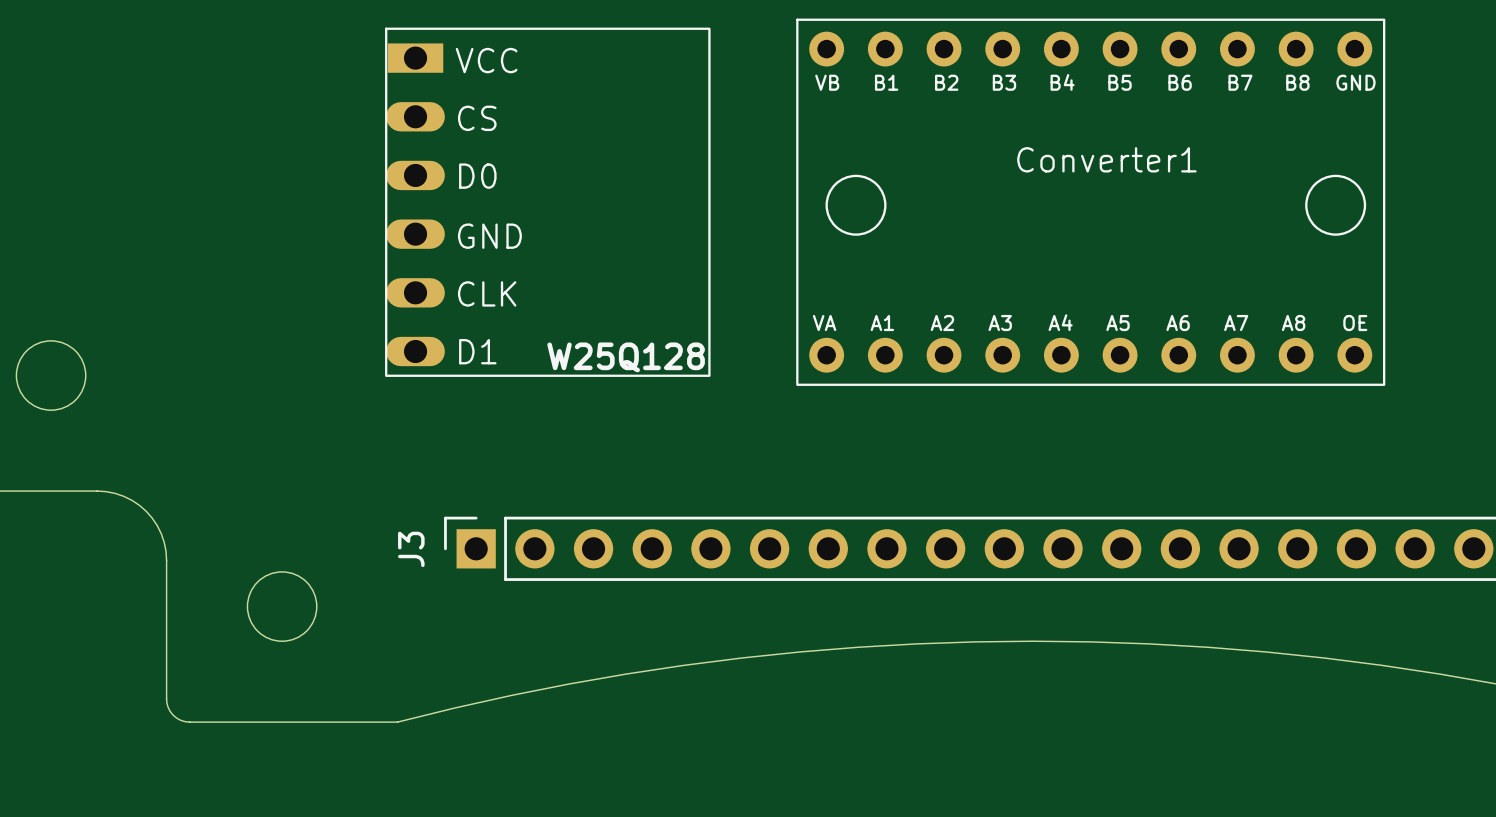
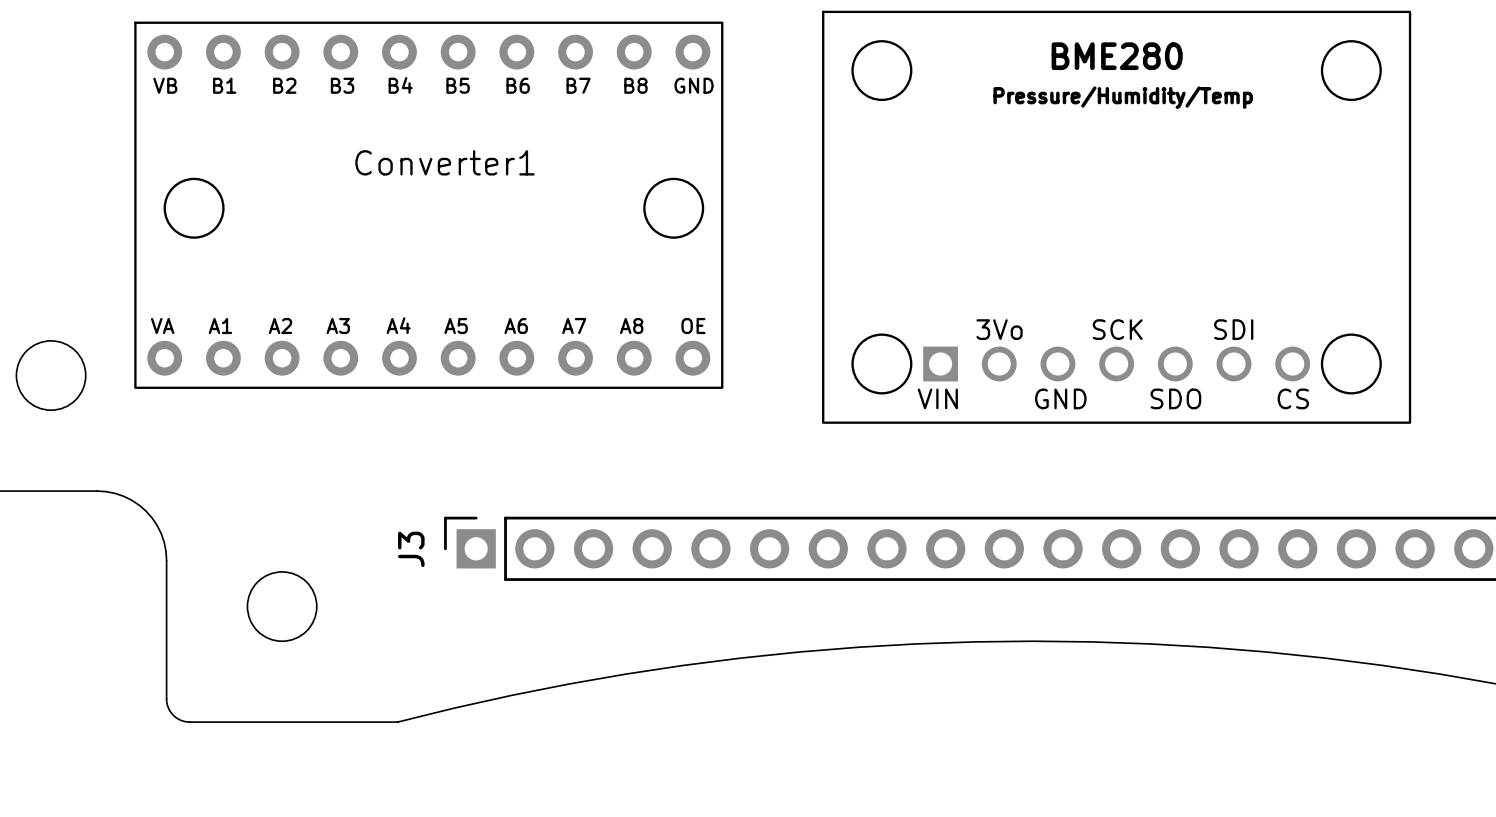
part: (547, 202) -> none
Converter1 position: (1090, 202) -> (428, 205)
part: none -> (1116, 217)

